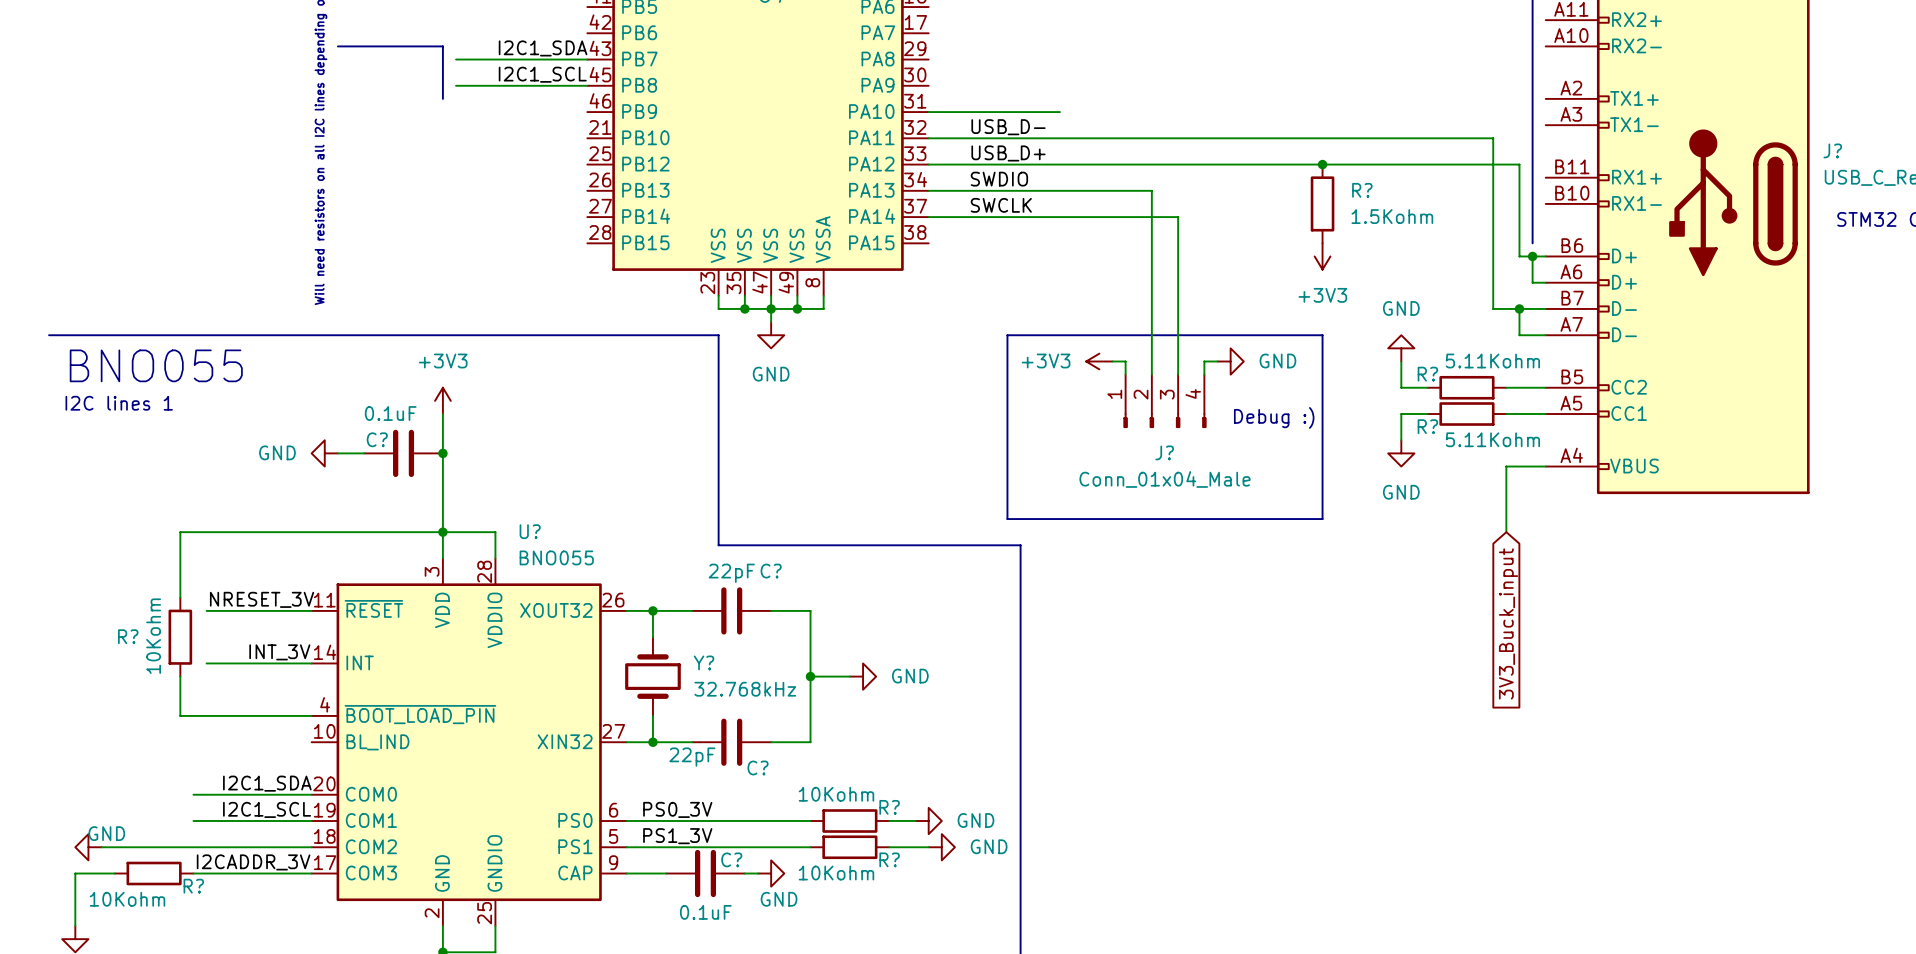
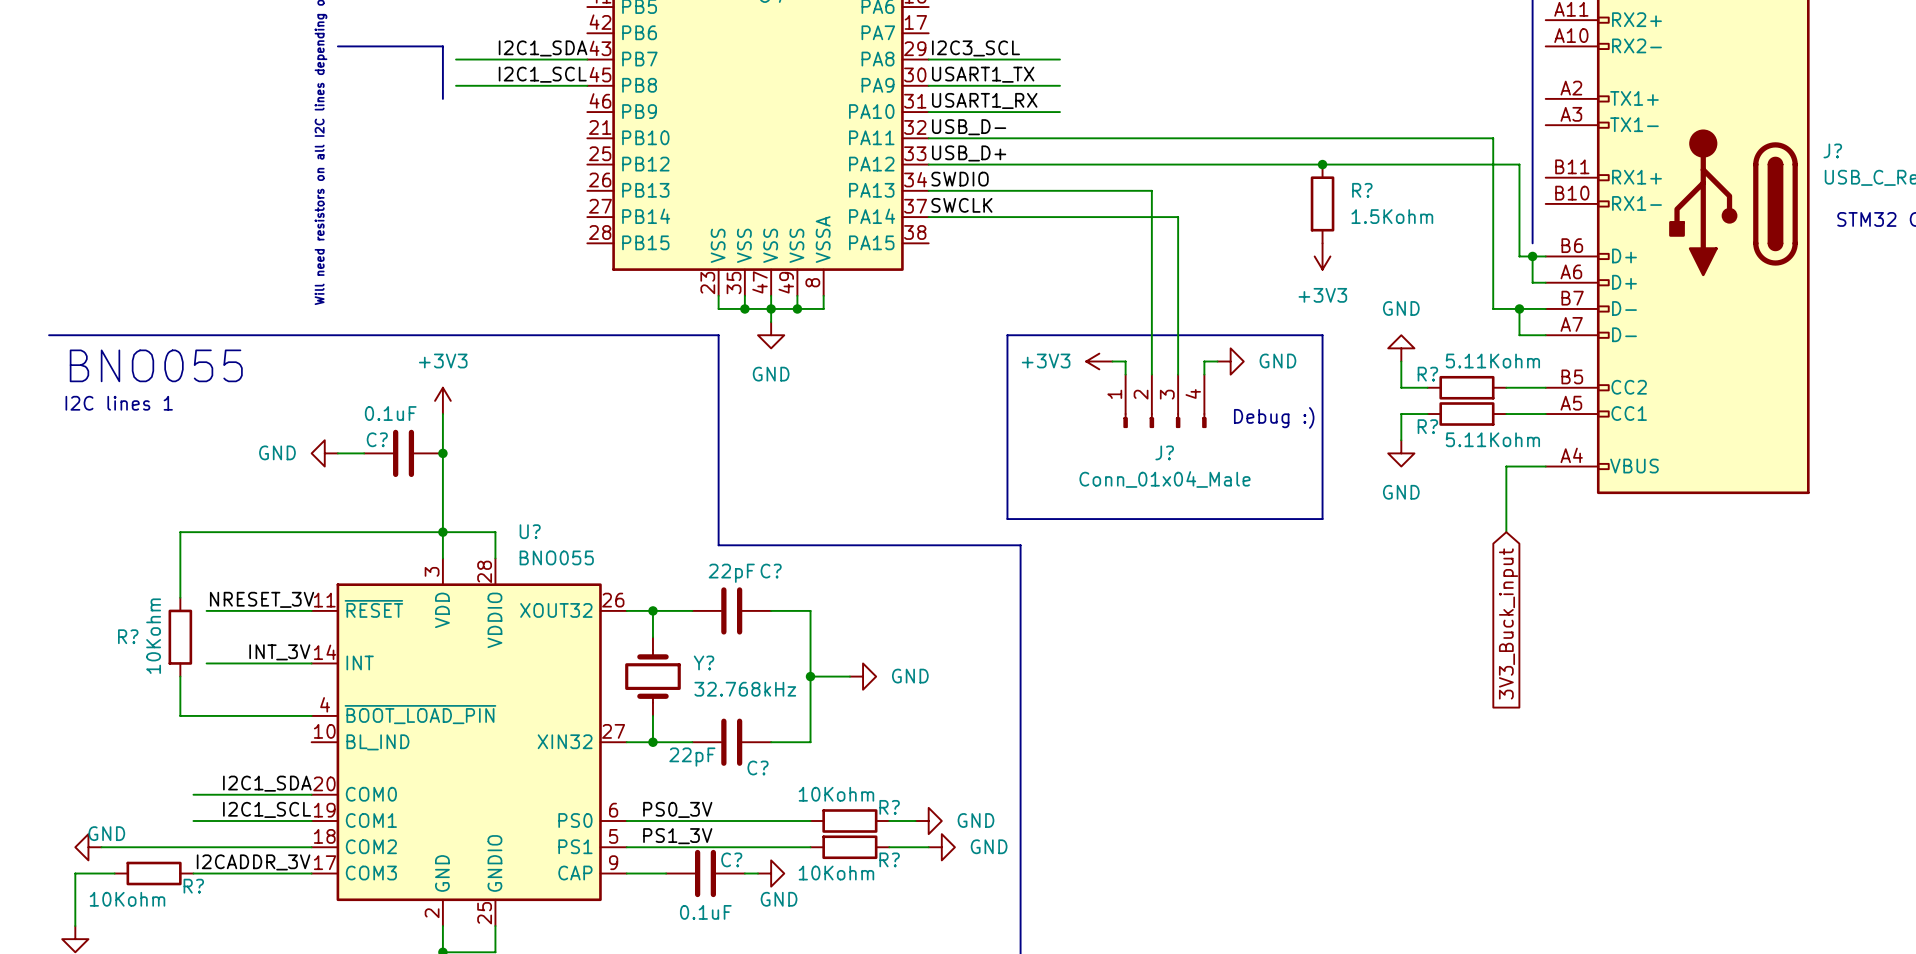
label: none -> I2C3_SCL (975, 48)
wire: none -> (928, 59) (1059, 59)
label: none -> USART1_TX (983, 74)
wire: none -> (928, 85) (1059, 85)
label: none -> USART1_RX (984, 100)
label position: USB_D- (1008, 127) -> USB_D- (969, 127)
label position: USB_D+ (1008, 153) -> USB_D+ (969, 153)
label position: SWDIO (999, 179) -> SWDIO (960, 179)
label position: SWCLK (1001, 205) -> SWCLK (961, 205)

